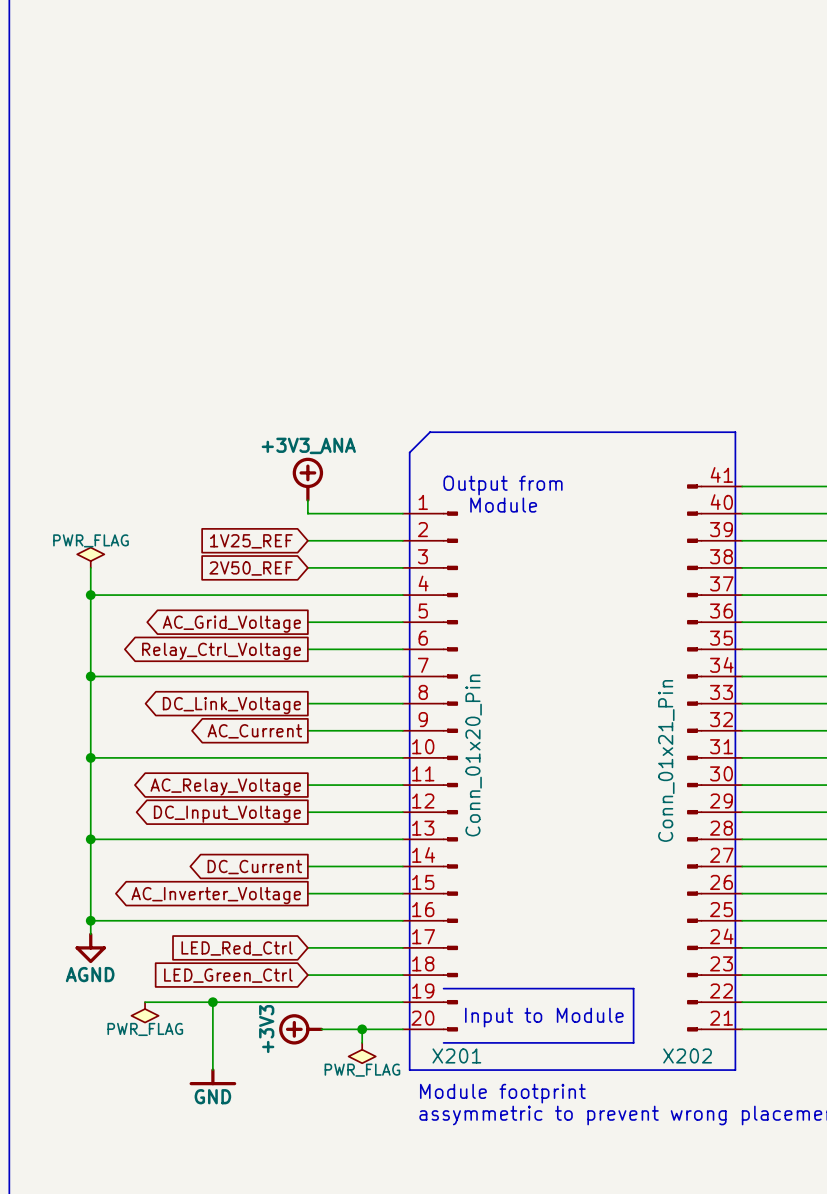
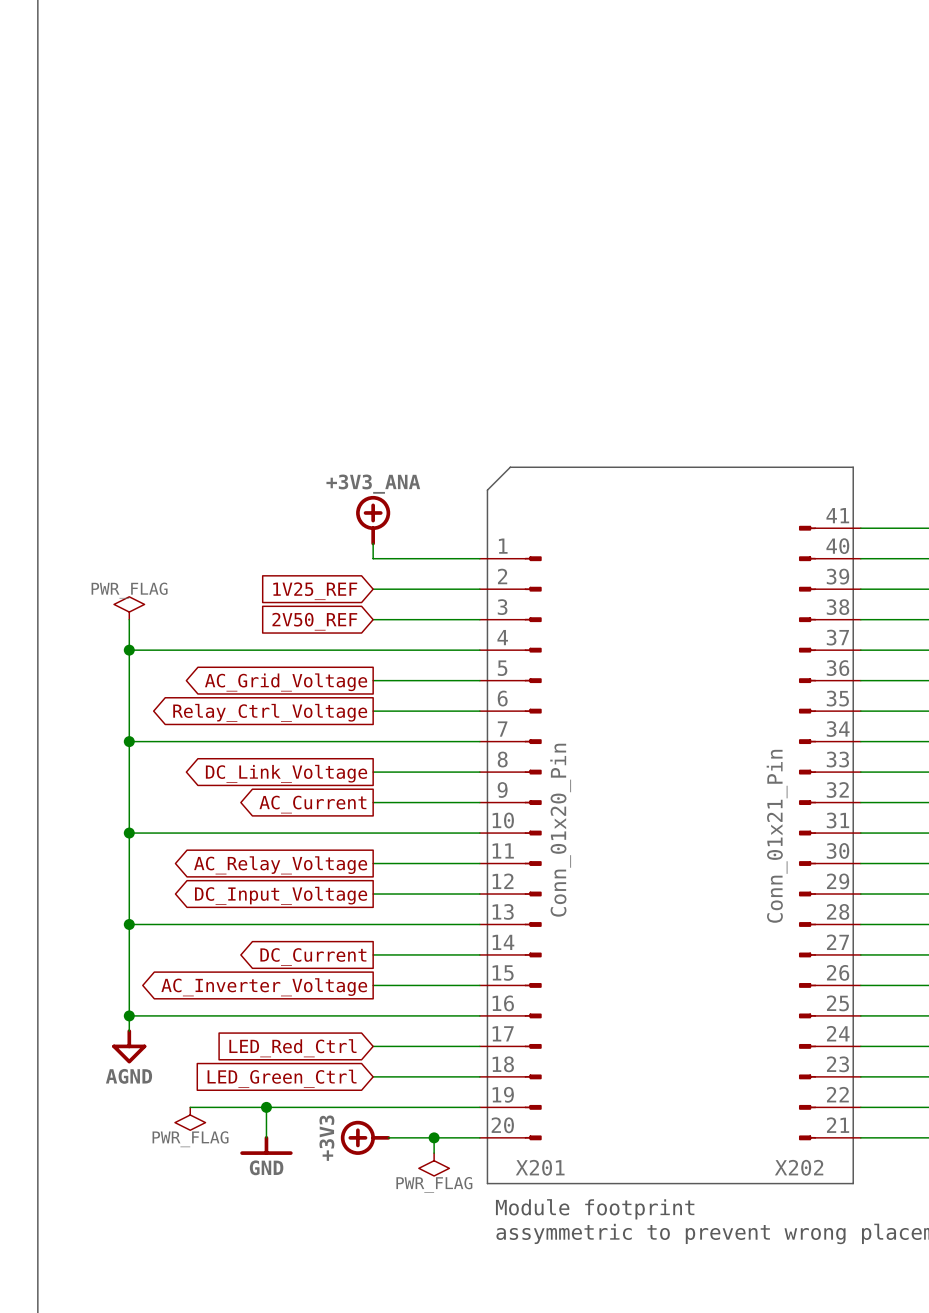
text: Output from (503, 485) -> none
text: Module (503, 505) -> none
line: (443, 988) (633, 988) (633, 1042) (443, 1042) -> none
text: Input to Module (544, 1017) -> none
power symbol position: GND (212, 1076) -> GND (266, 1145)

